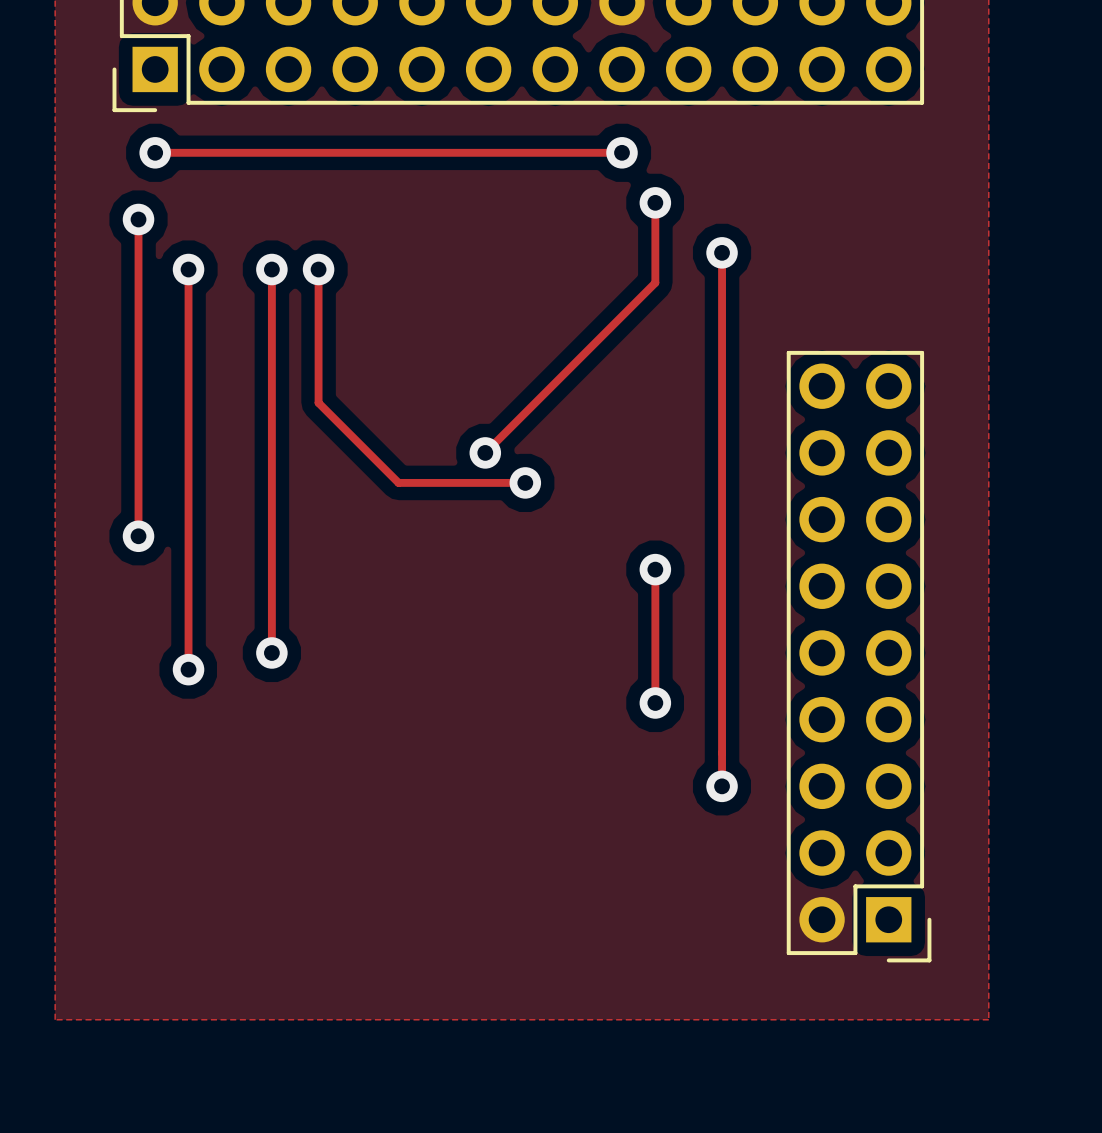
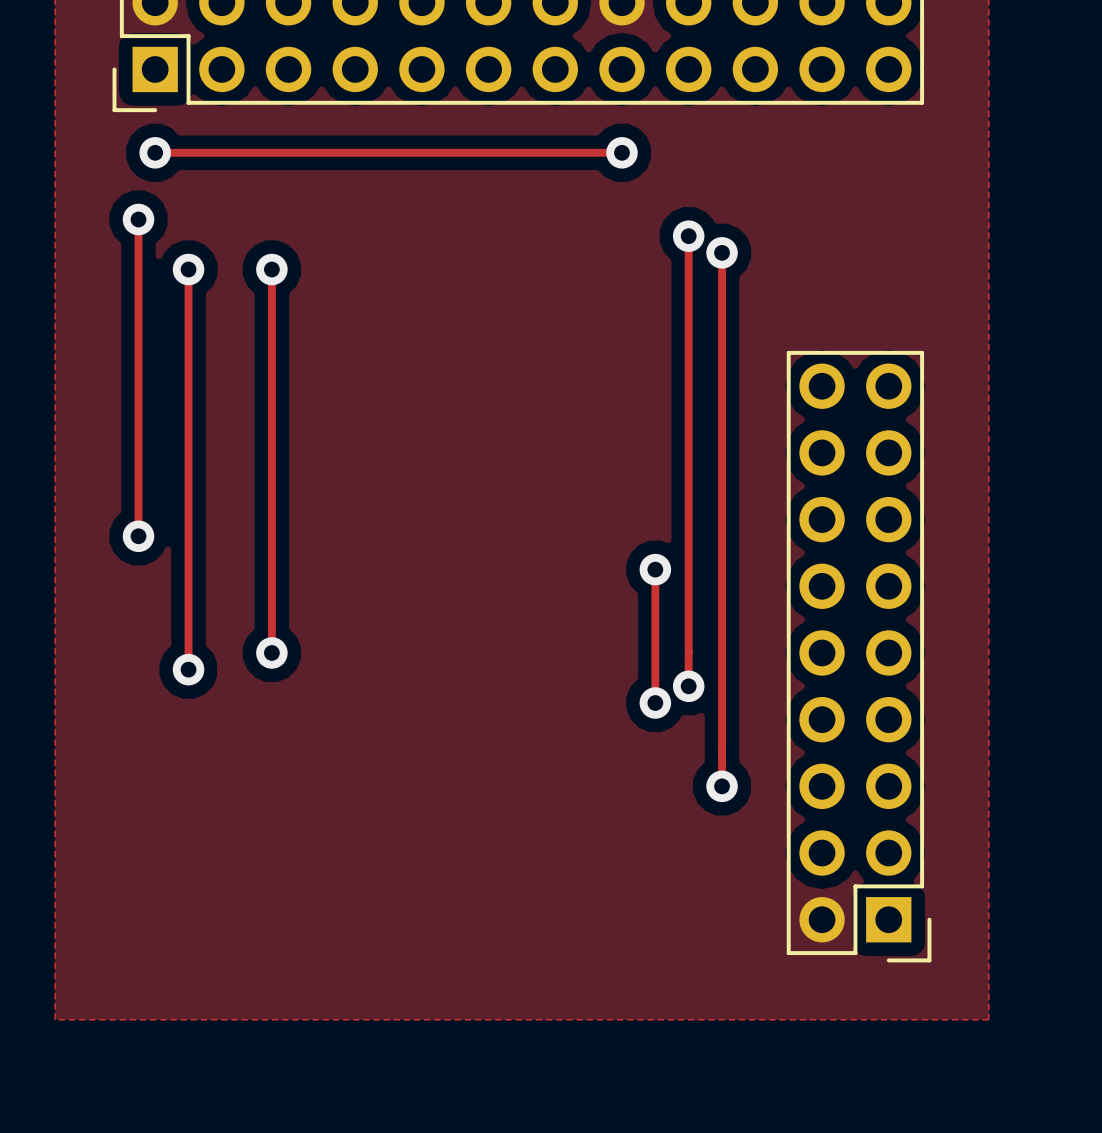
track: (655, 202) (655, 282) (485, 452) -> none
via position: (655, 202) -> (688, 236)
track: none -> (688, 236) (688, 686)
track: (318, 269) (318, 402) (398, 482) (525, 482) -> none
via: (318, 269) -> none
via: (485, 452) -> none
via: (525, 482) -> none
via: none -> (688, 686)

